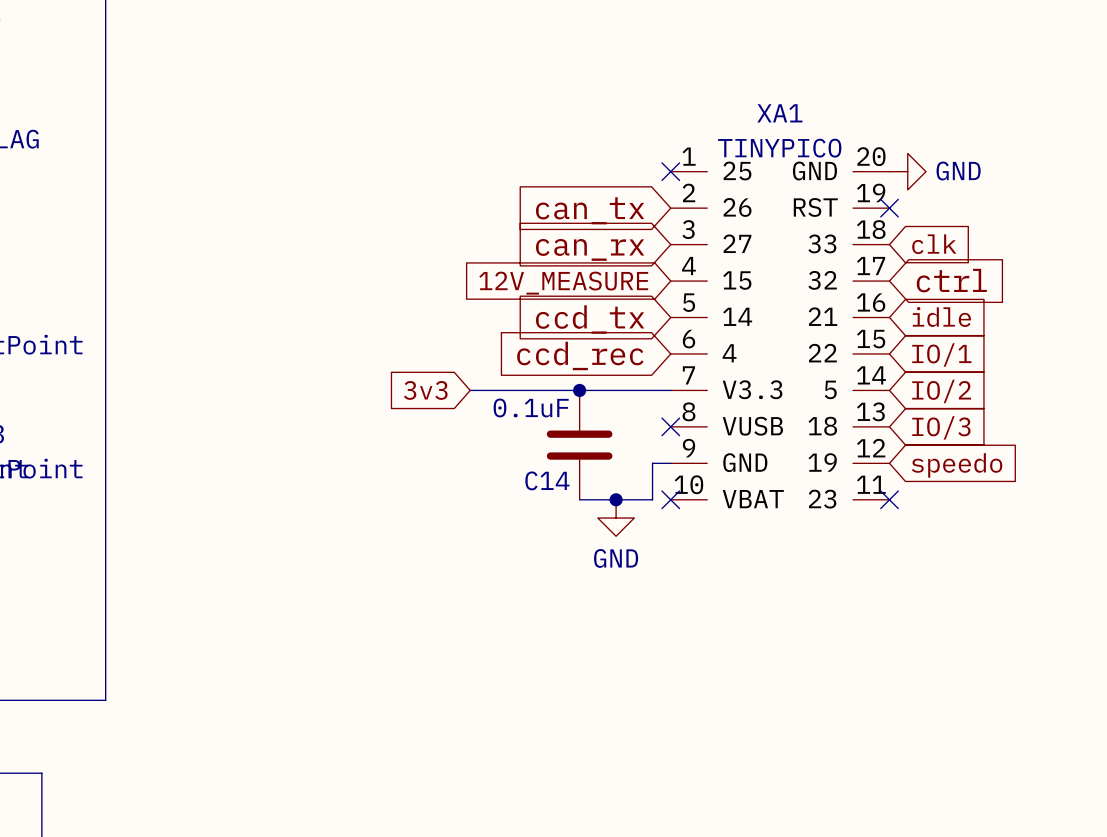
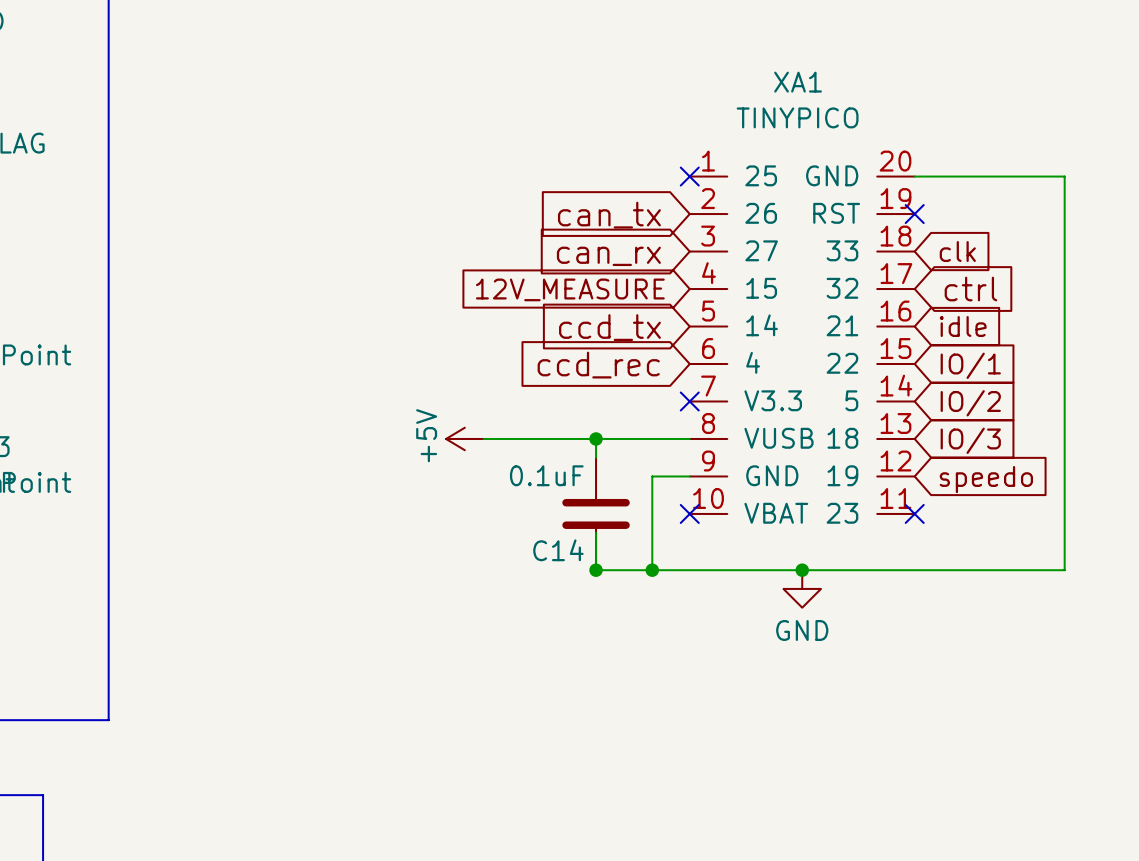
XA1 name position: XA1 (779, 113) -> XA1 (798, 82)
XA1 value position: TINYPICO (779, 148) -> TINYPICO (797, 117)
wire: none -> (914, 176) (1064, 176) (1064, 570) (596, 570) (596, 532)
power symbol: GND (907, 171) -> none
global label: 3v3 (425, 390) -> none
wire: (470, 390) (670, 390) -> (483, 438) (689, 438)
junction position: (579, 390) -> (596, 438)
power symbol: none -> +5V (464, 438)
no-connect mark position: (670, 426) -> (689, 401)
C14 position: (579, 445) -> (596, 513)
wire: (652, 463) (652, 499) (579, 499) -> (671, 476) (652, 476) (652, 570)
junction: (616, 499) -> none
power symbol position: GND (616, 518) -> GND (802, 588)
junction: none -> (596, 570)
junction: none -> (652, 570)
junction: none -> (802, 570)

